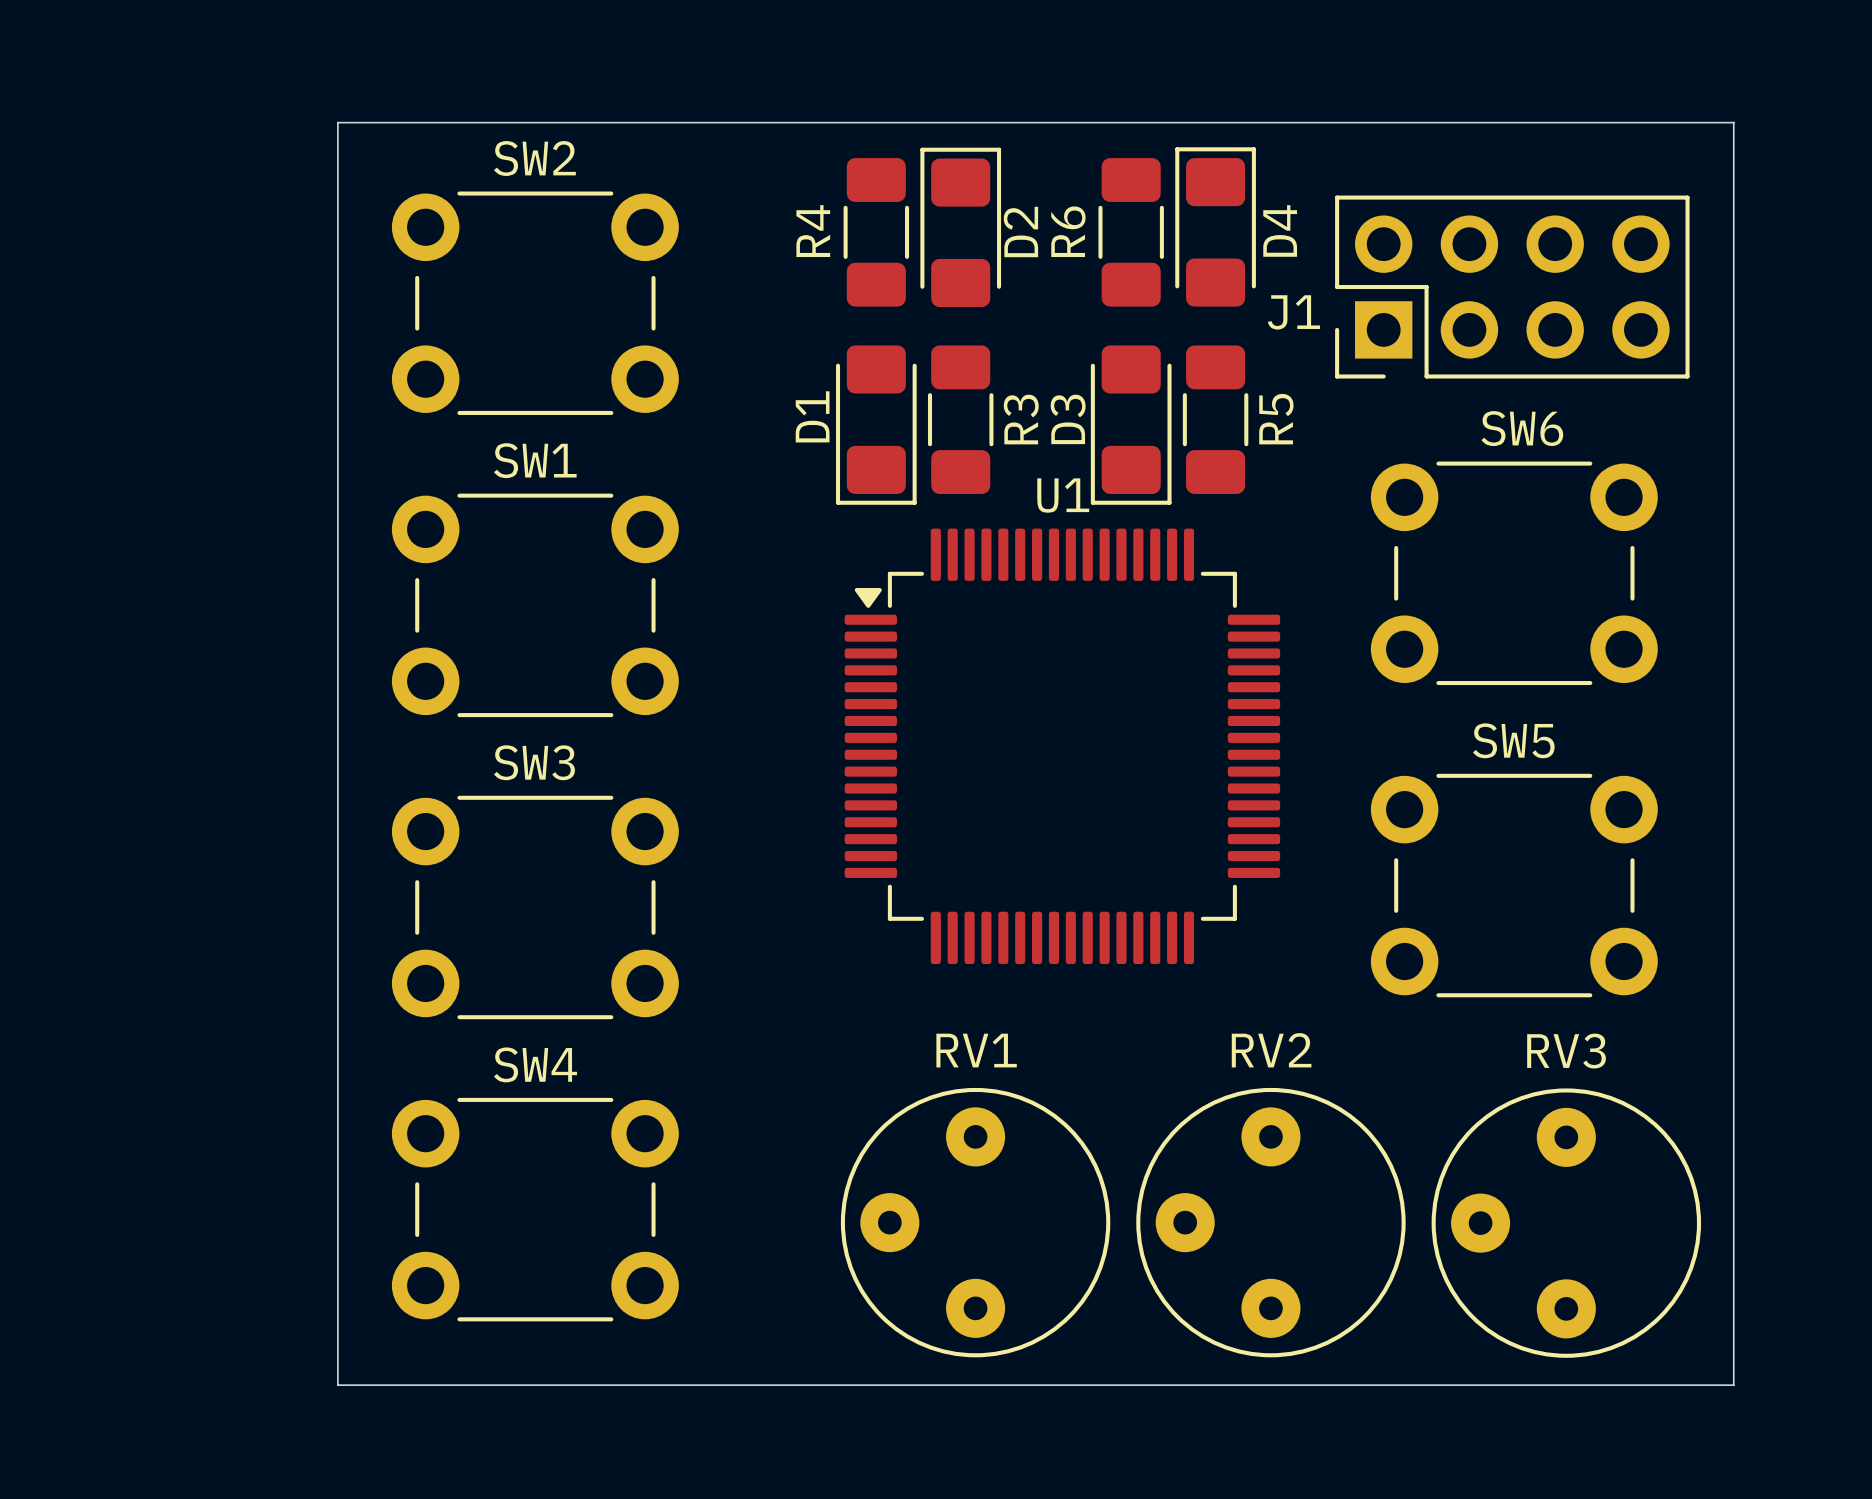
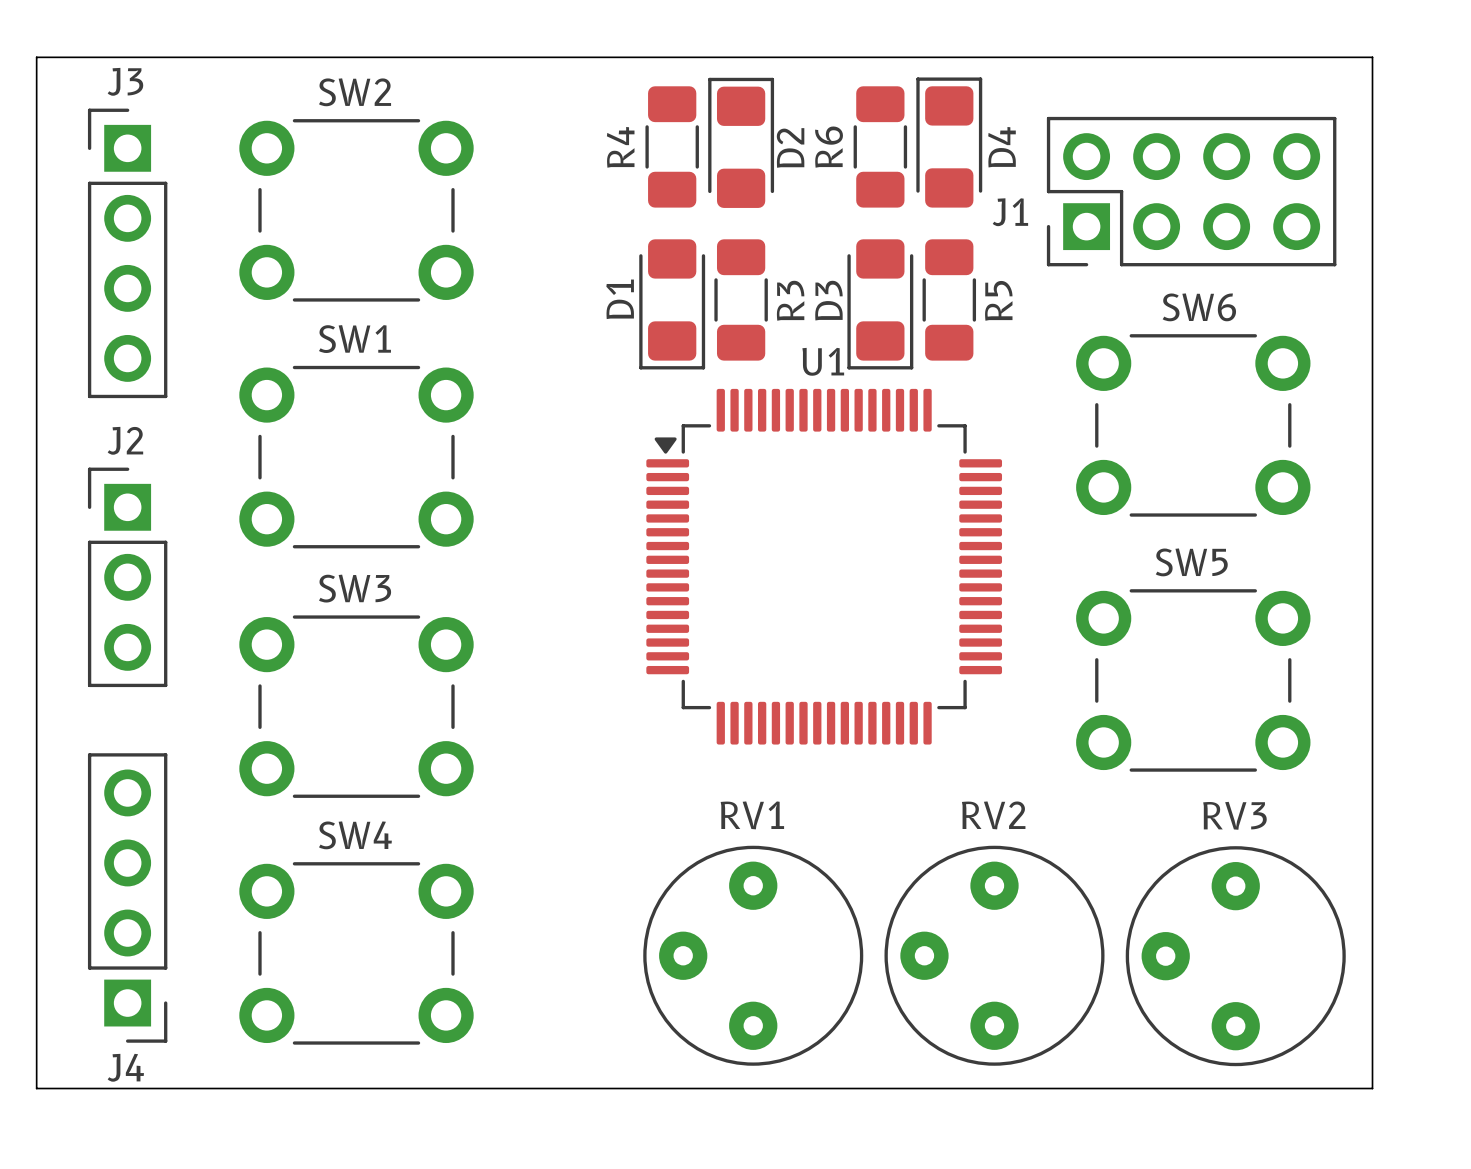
board edge: (337, 122) (337, 1385) -> (232, 57) (36, 57) (36, 1088) (232, 1088)
SW2 position: (535, 303) -> (356, 210)
J3: none -> (127, 253)
SW1 position: (535, 605) -> (356, 457)
J2: none -> (127, 577)
SW3 position: (535, 907) -> (356, 706)
J4: none -> (127, 897)
SW4 position: (535, 1209) -> (356, 953)

